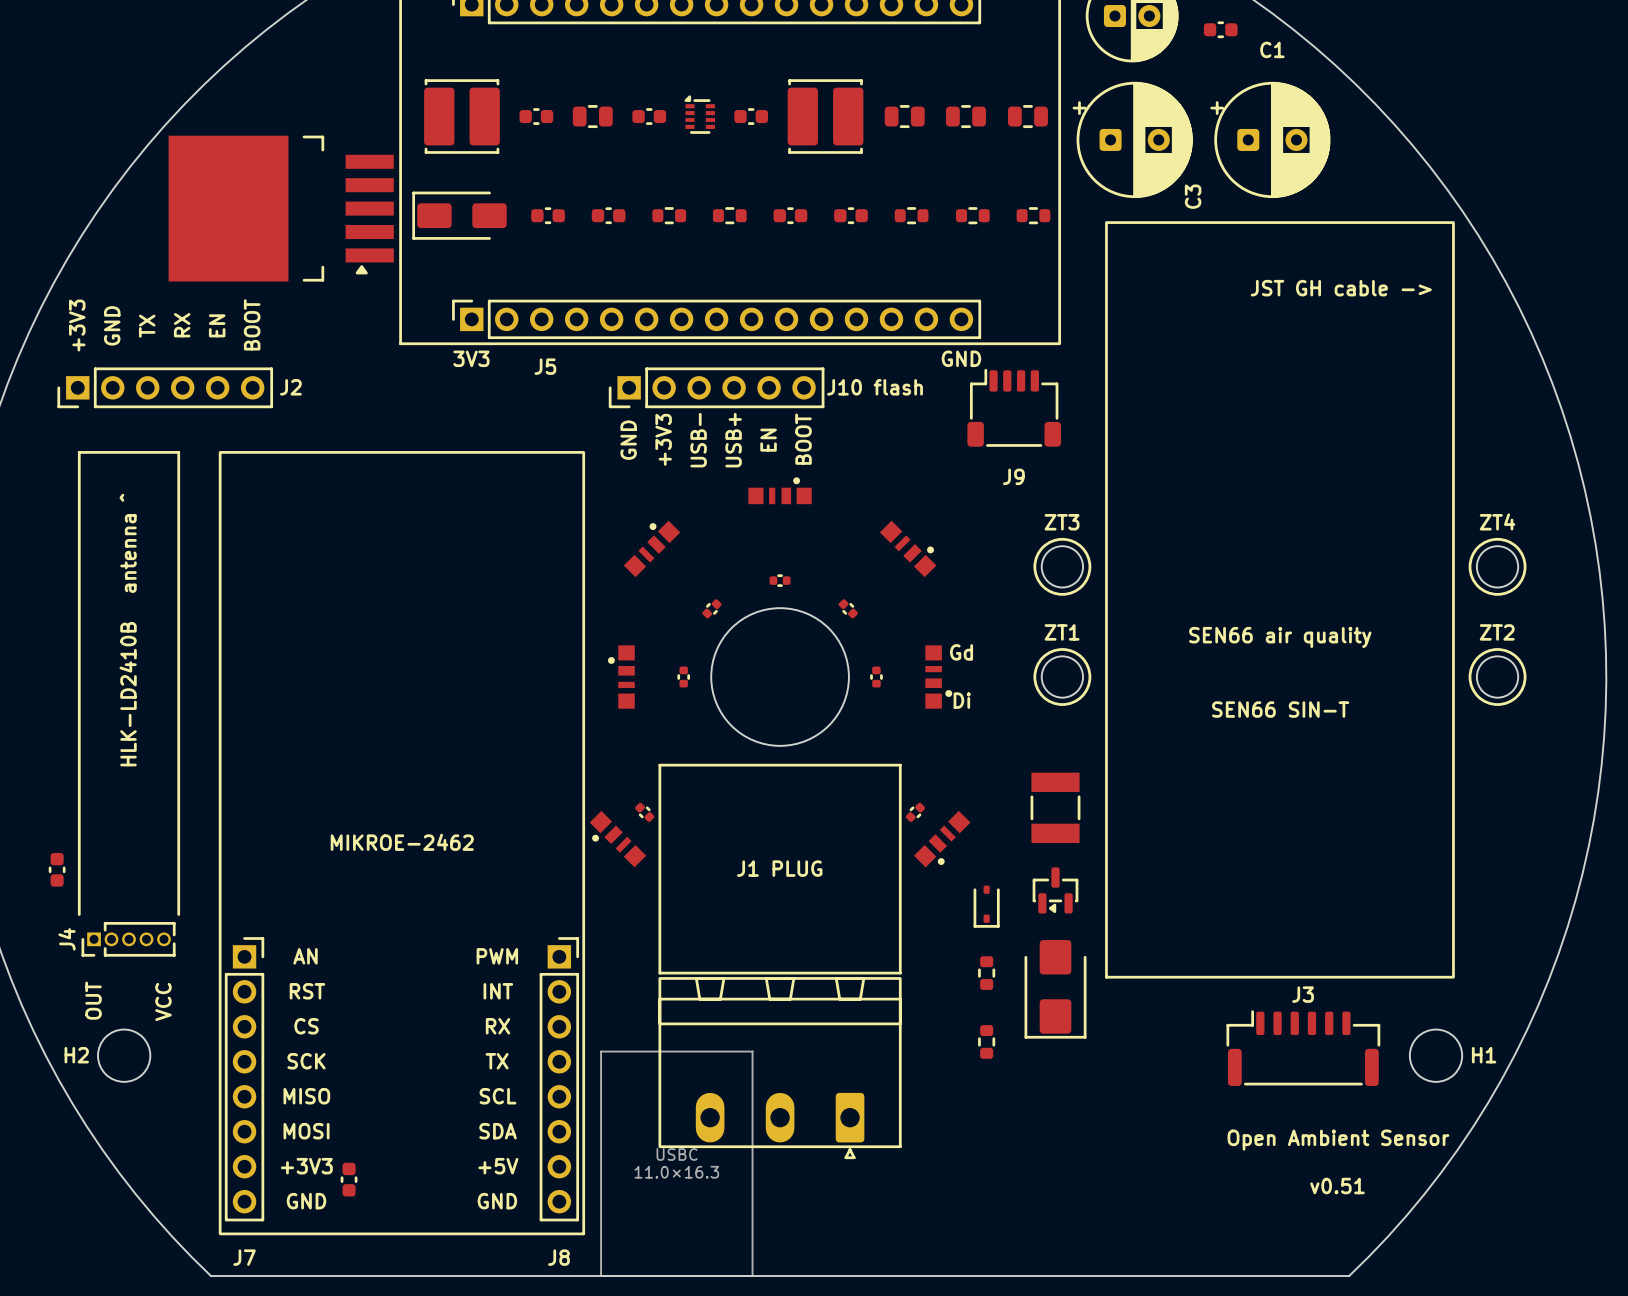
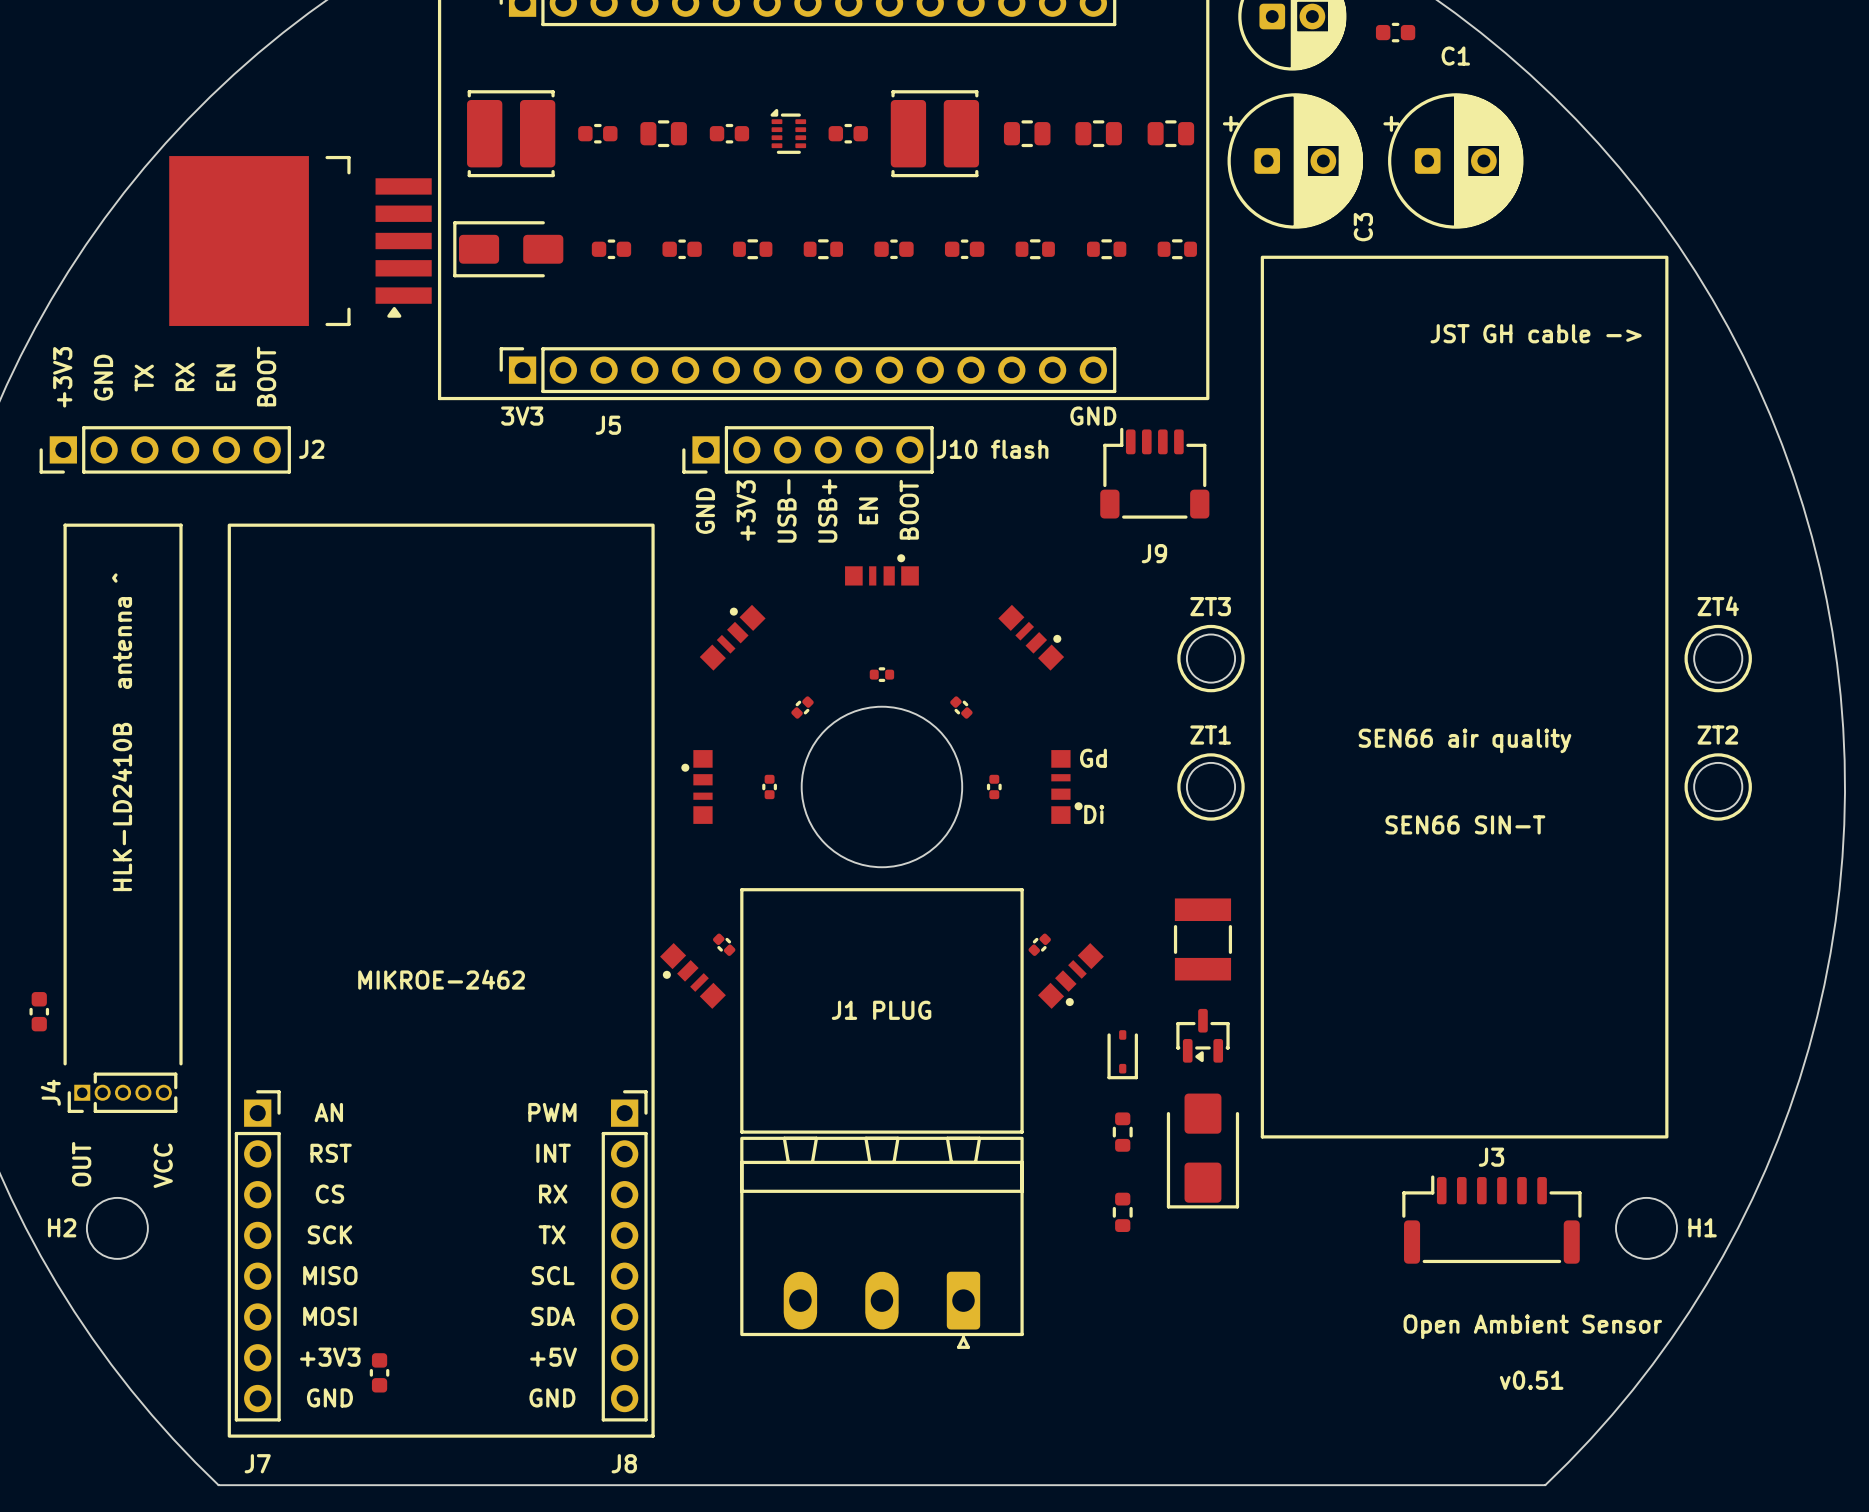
line: (601, 1051) (752, 1051) (752, 1276) (601, 1276) (601, 1051) -> none
text: USBC (677, 1154) -> none
text: 11.0×16.3 (676, 1172) -> none

